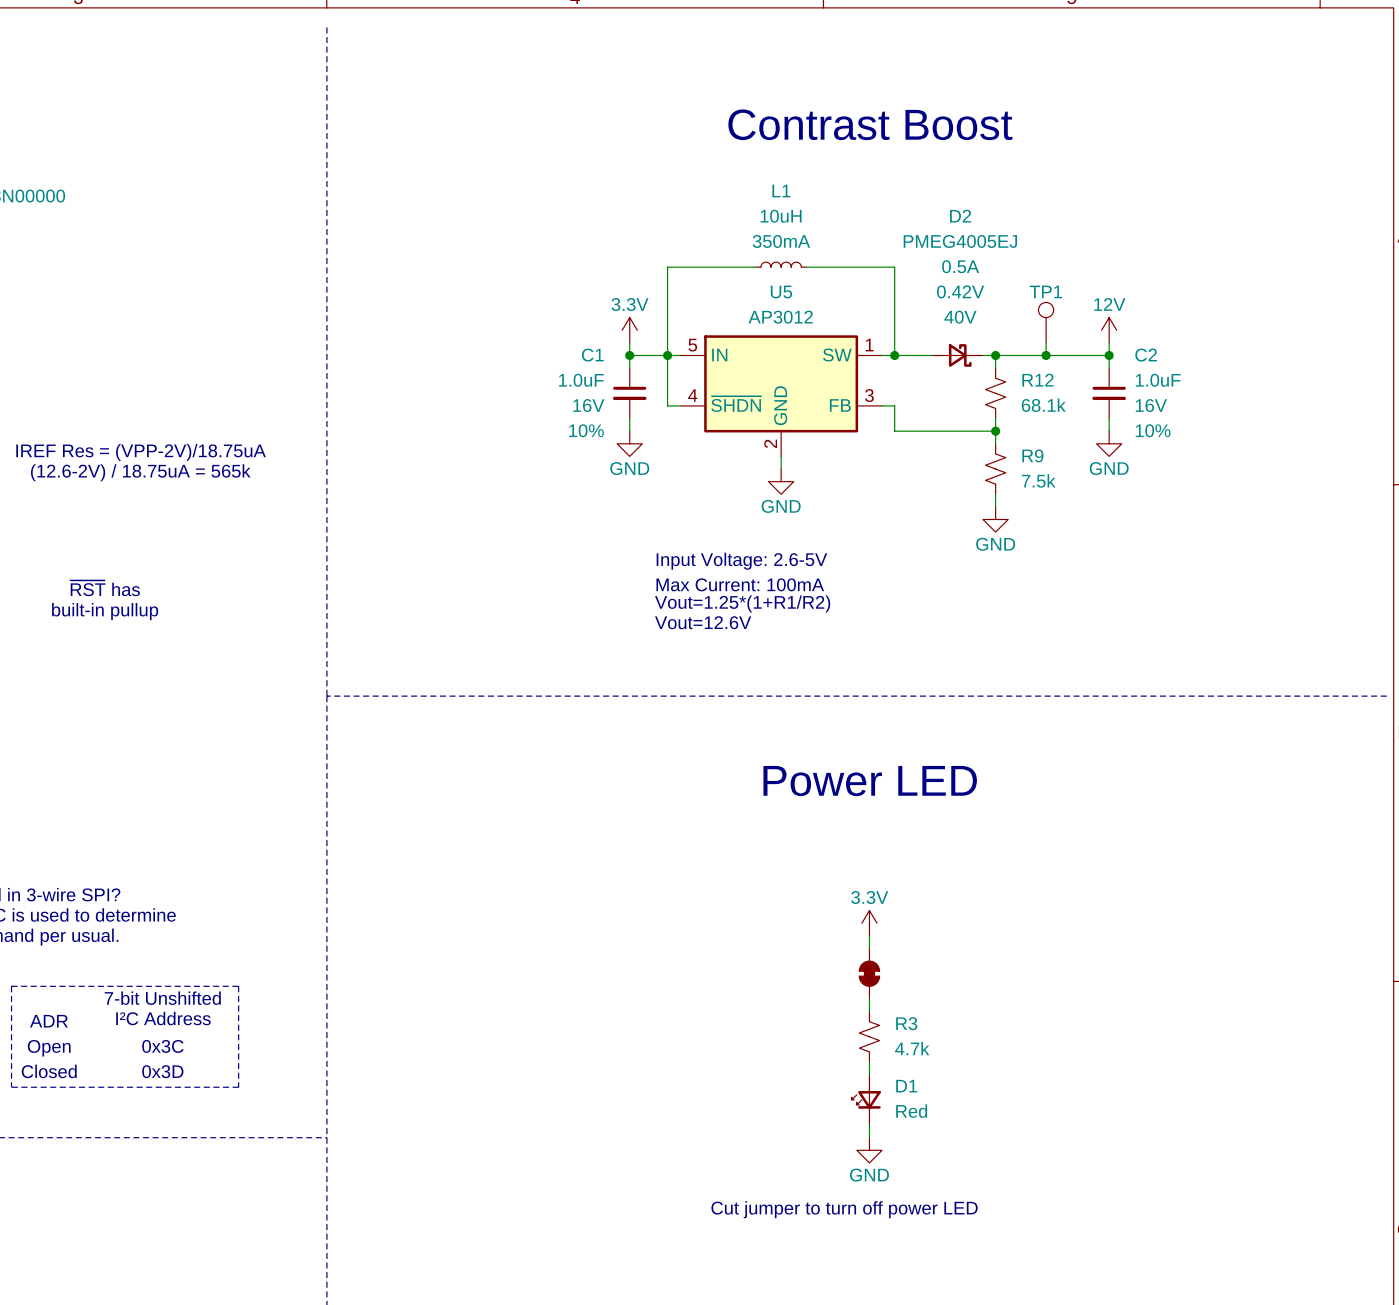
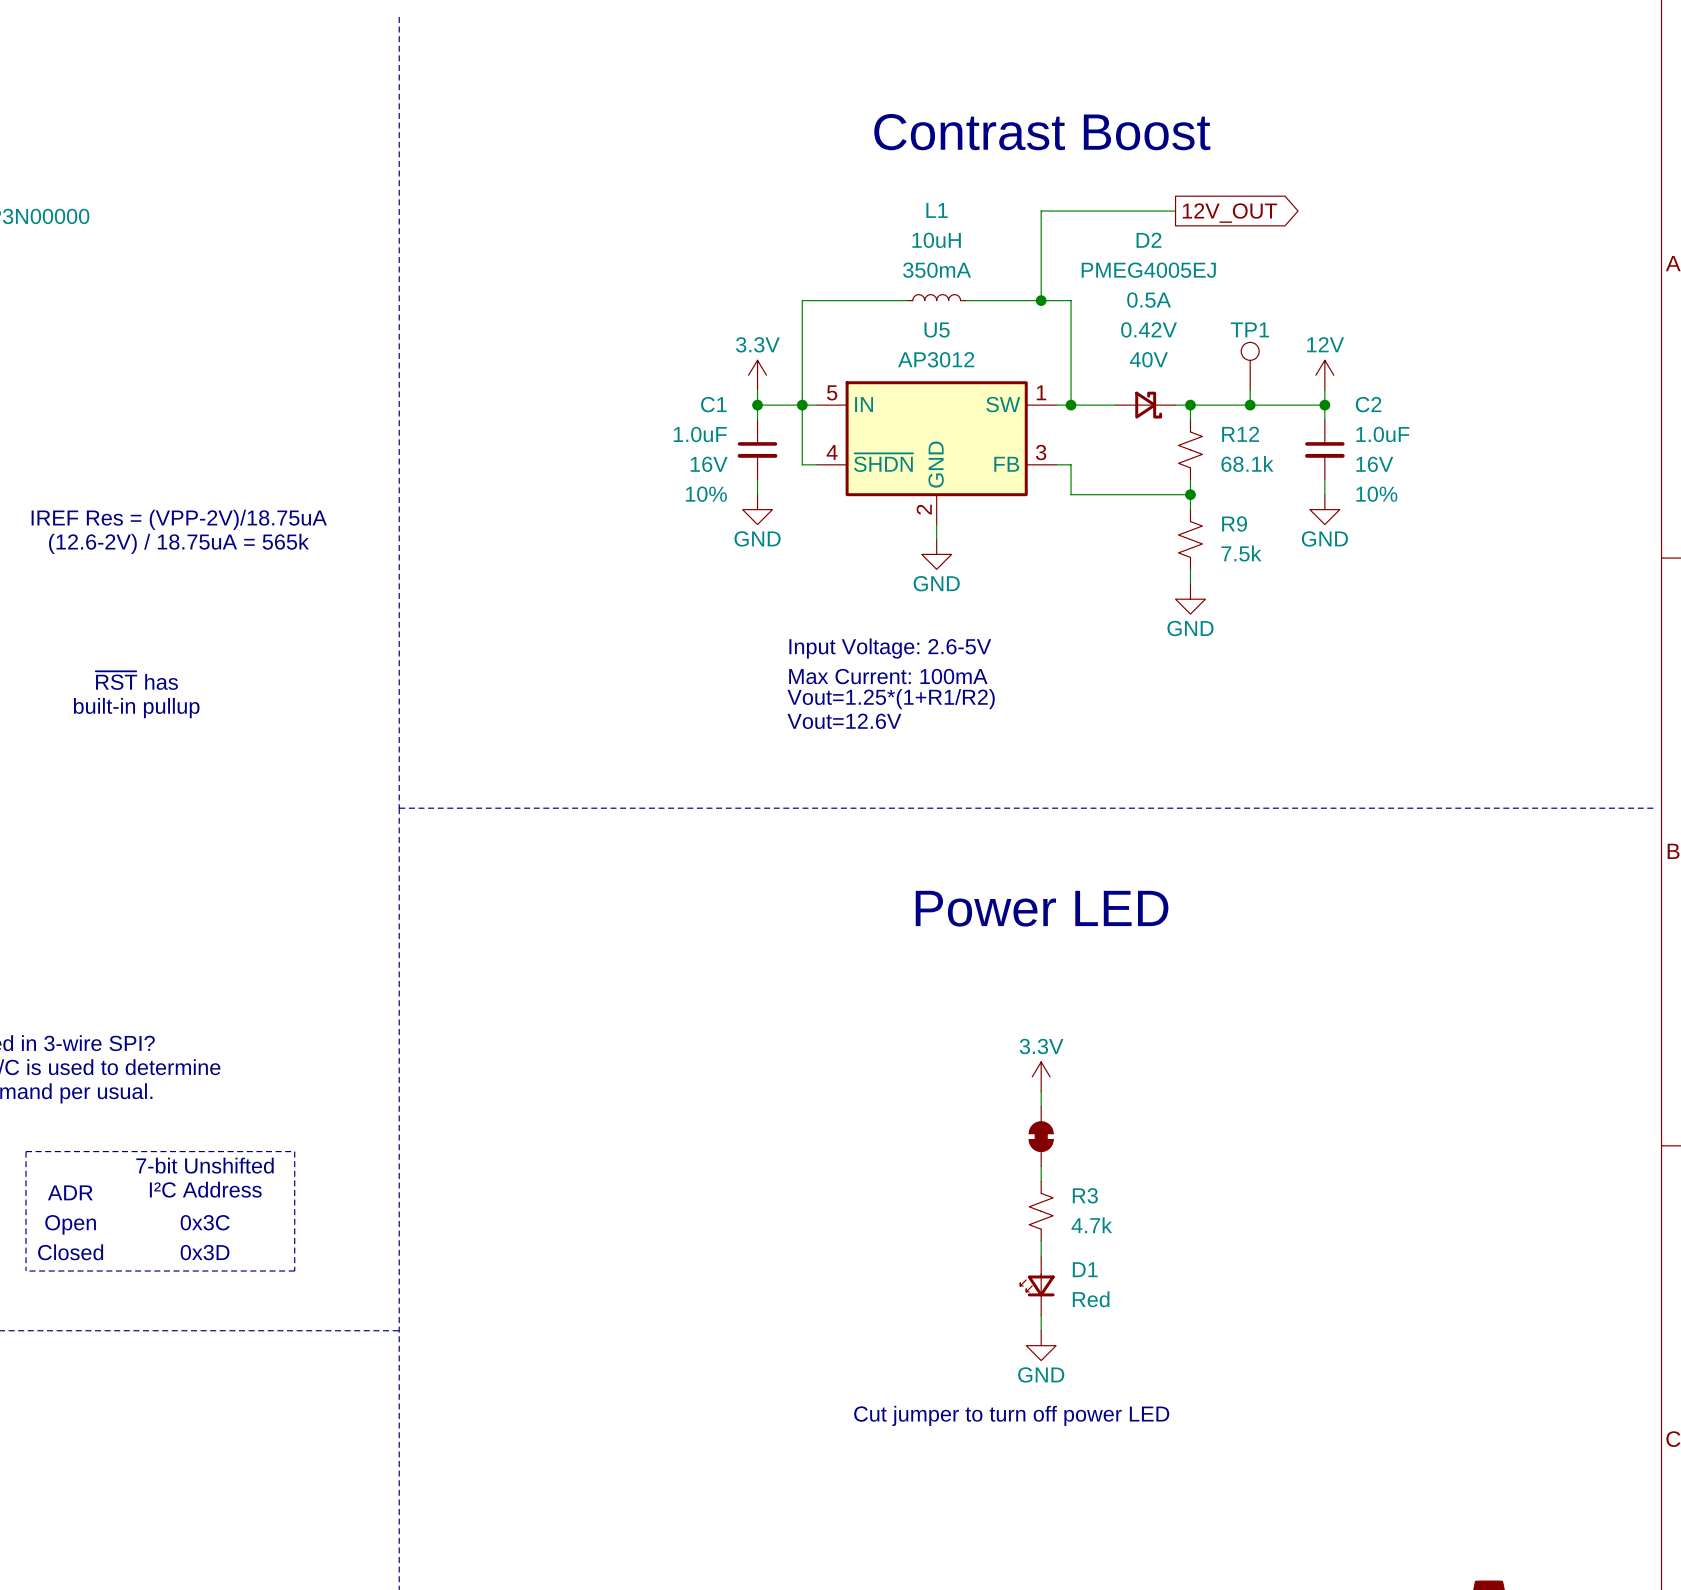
wire: none -> (1175, 211) (1041, 211) (1041, 300)
global label: none -> 12V_OUT (1229, 213)
junction: none -> (1041, 300)

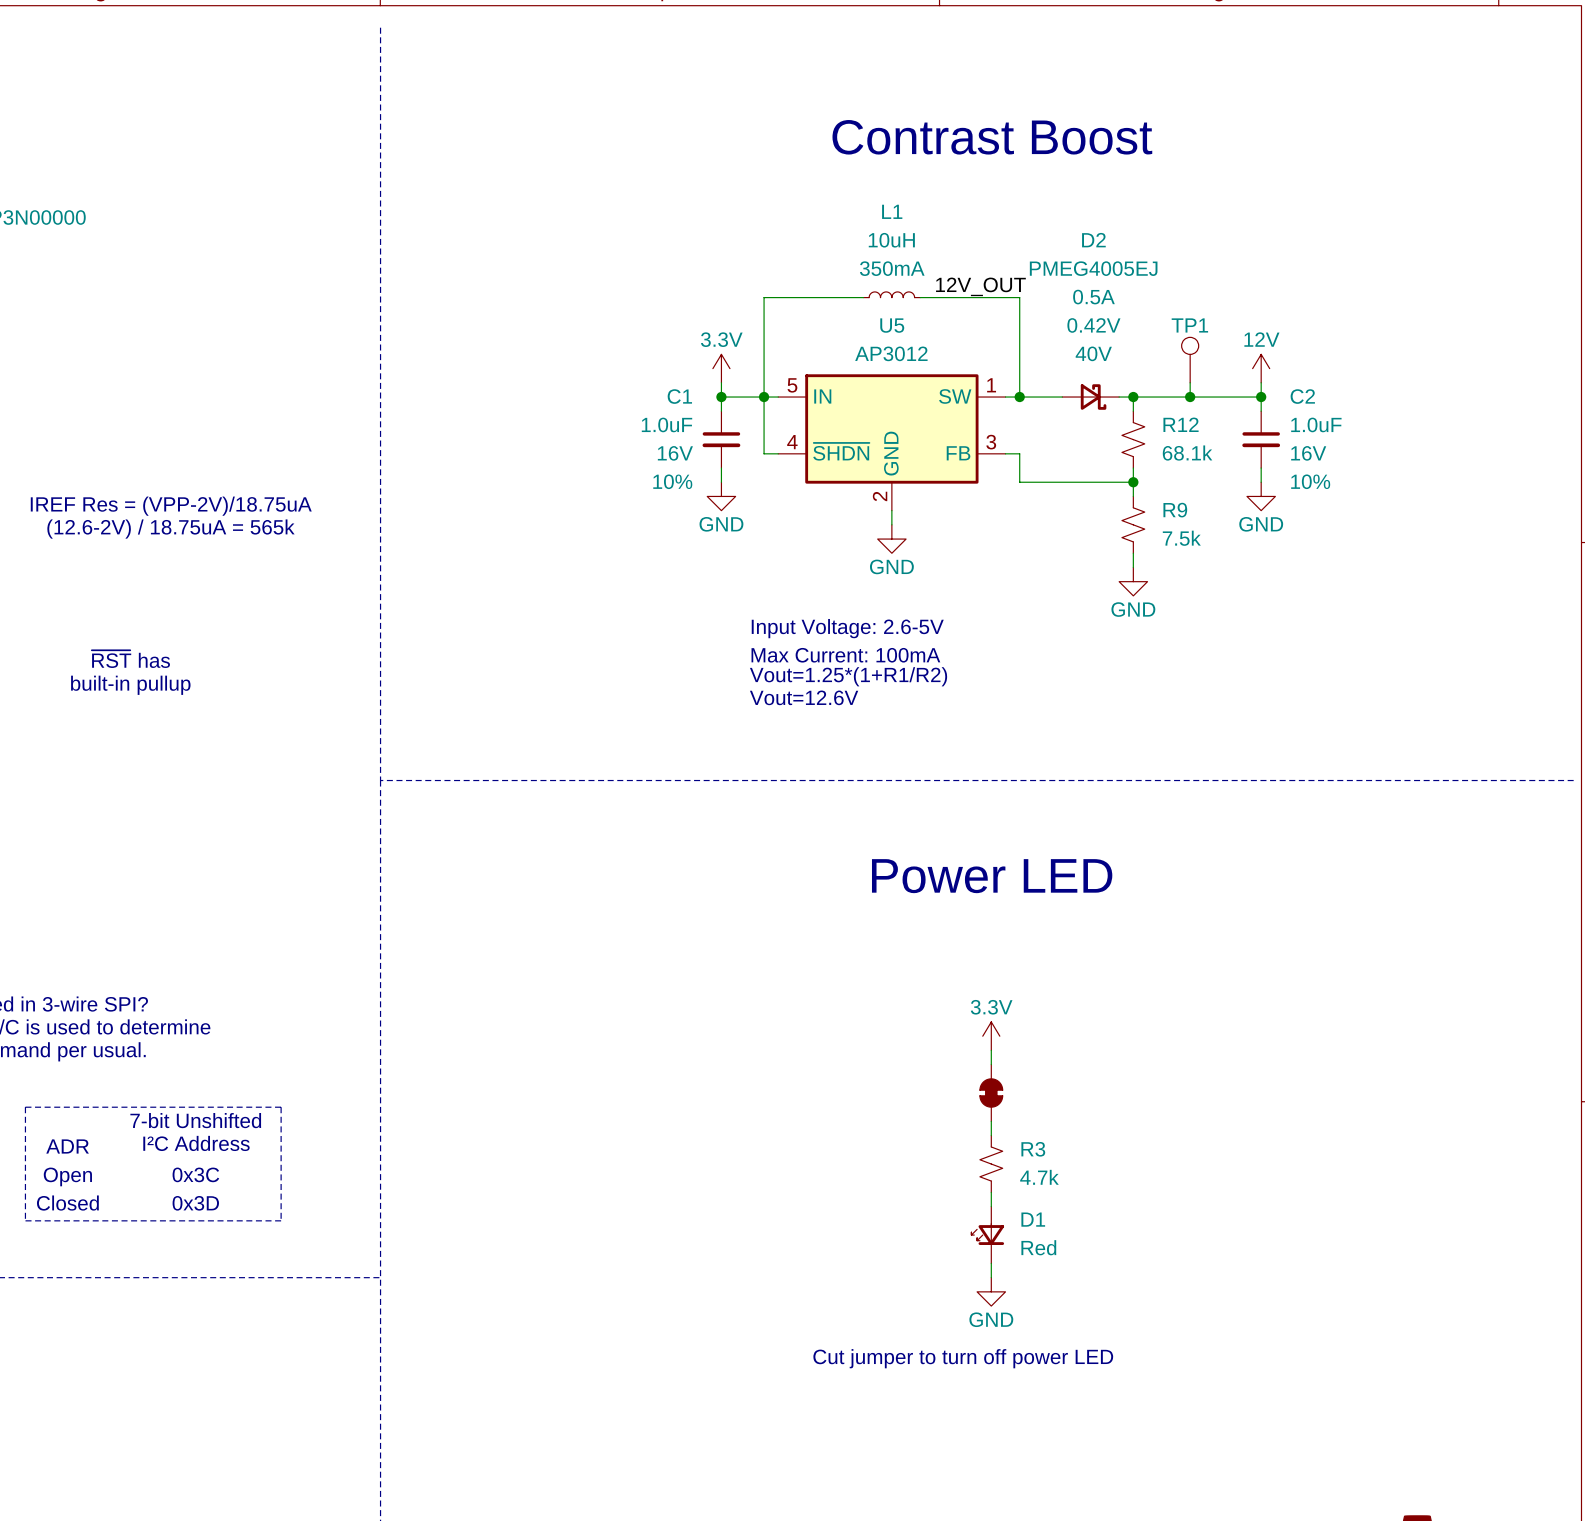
wire: (1175, 211) (1041, 211) (1041, 300) -> none
global label: 12V_OUT (1229, 213) -> none
label: none -> 12V_OUT (980, 286)
junction: (1041, 300) -> none

